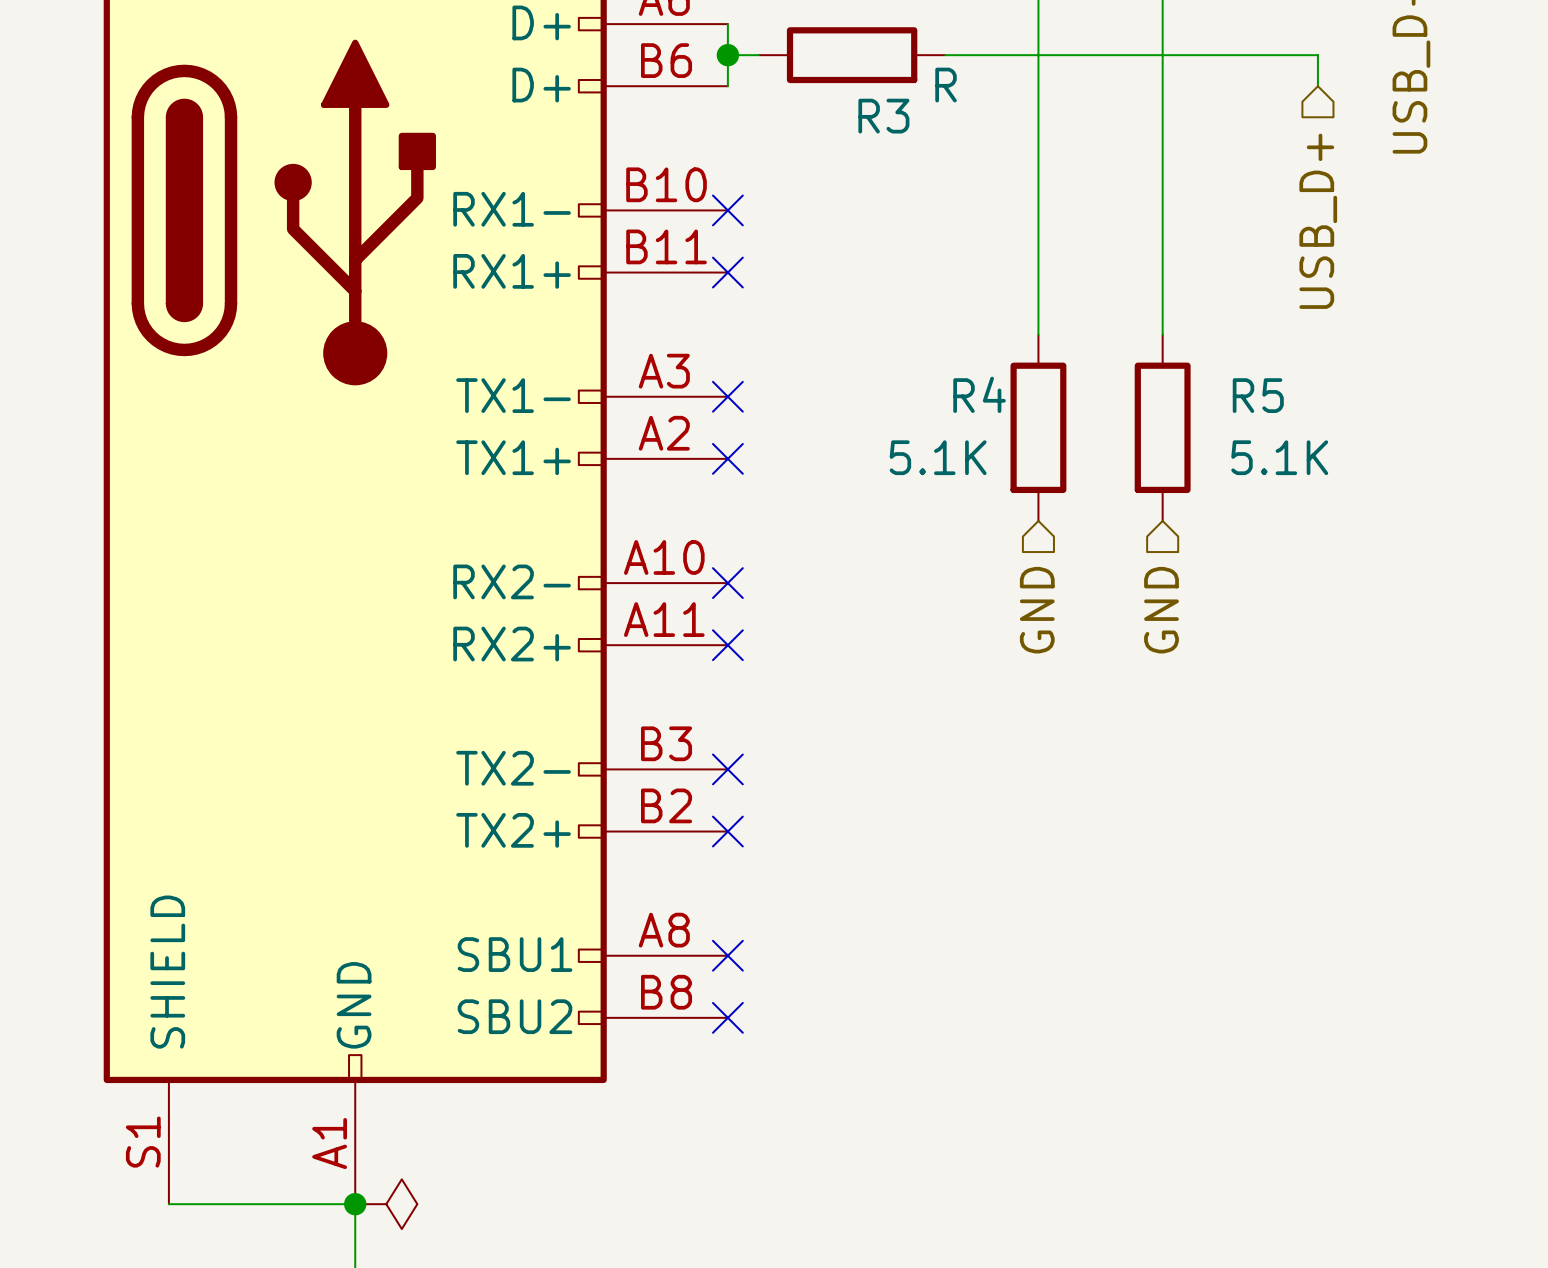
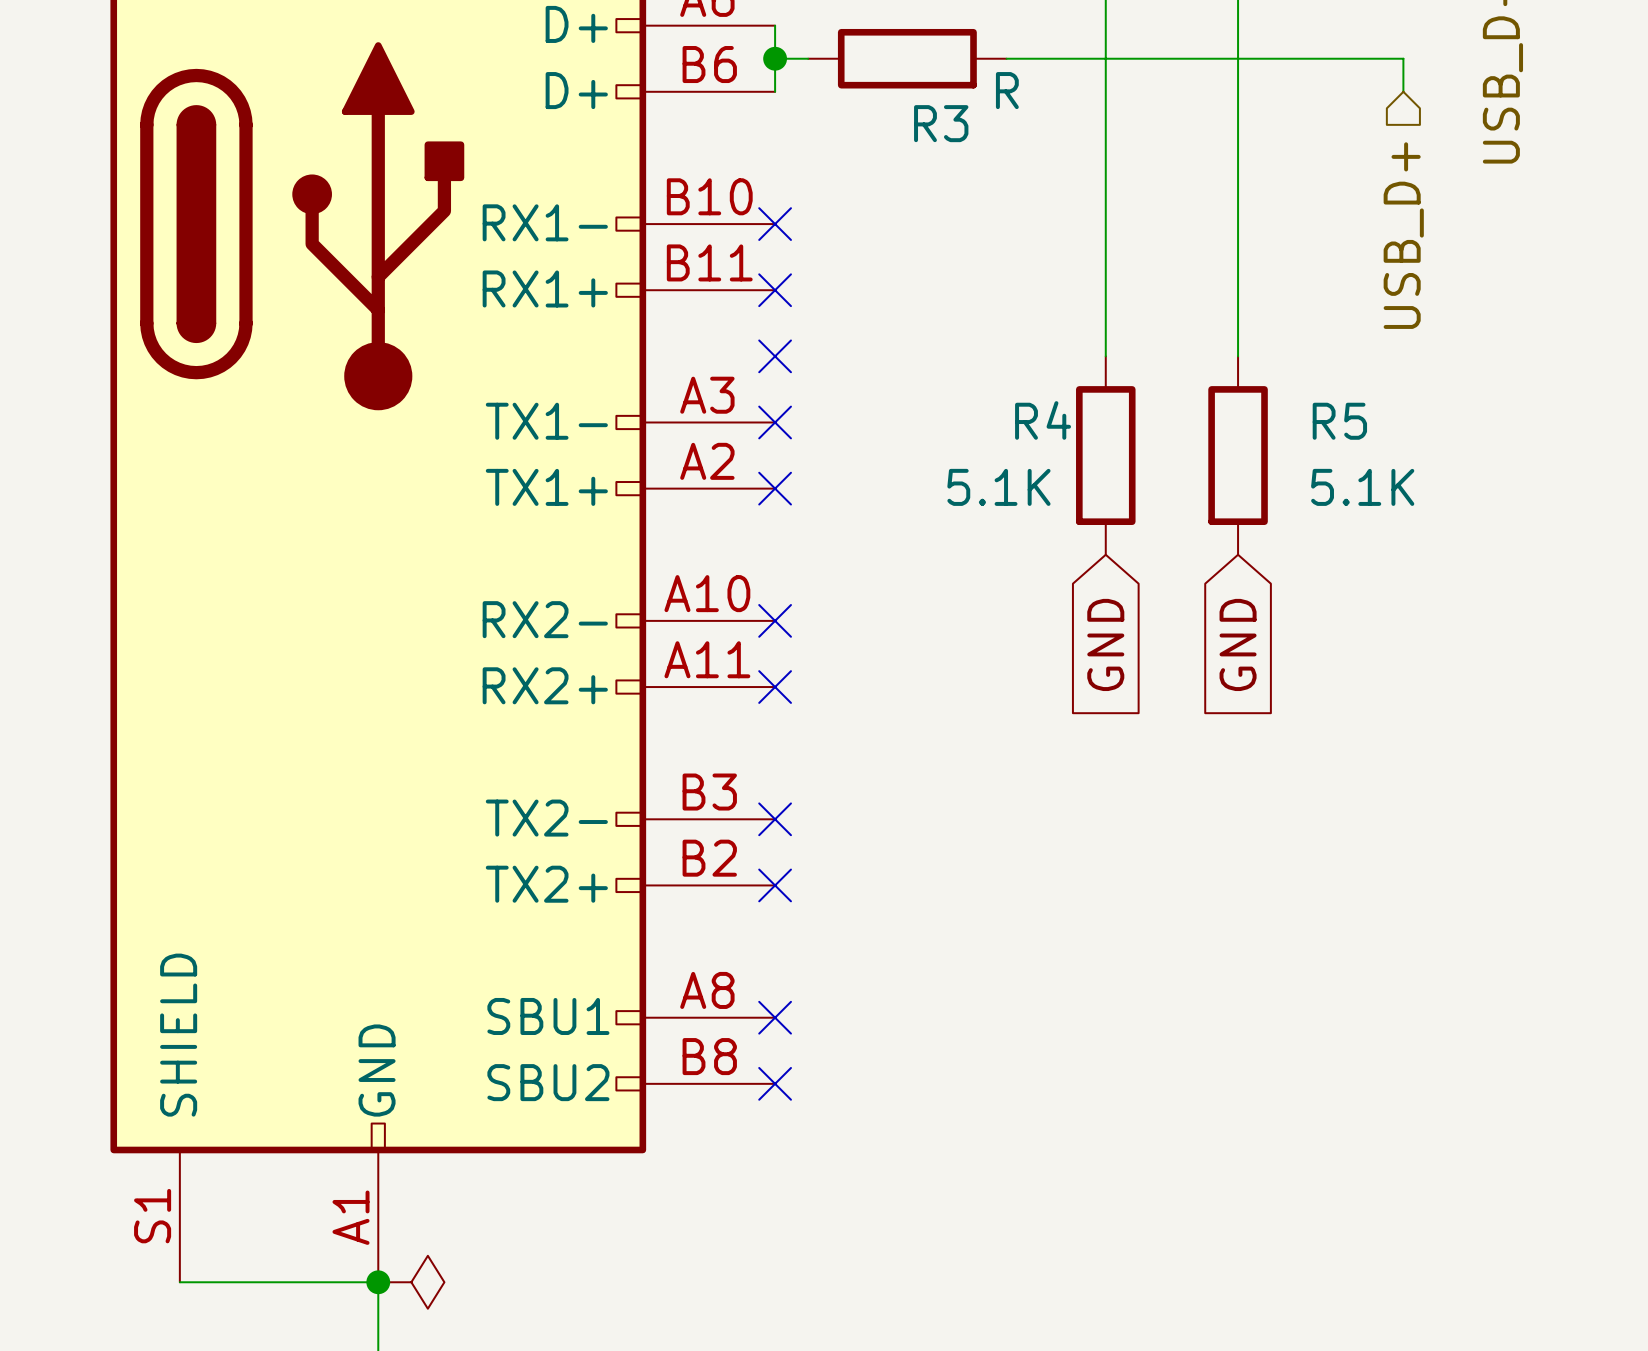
no-connect mark: none -> (775, 356)
global label: none -> GND (1105, 644)
global label: none -> GND (1238, 644)
hierarchical label: GND (1037, 610) -> none
hierarchical label: GND (1161, 610) -> none

